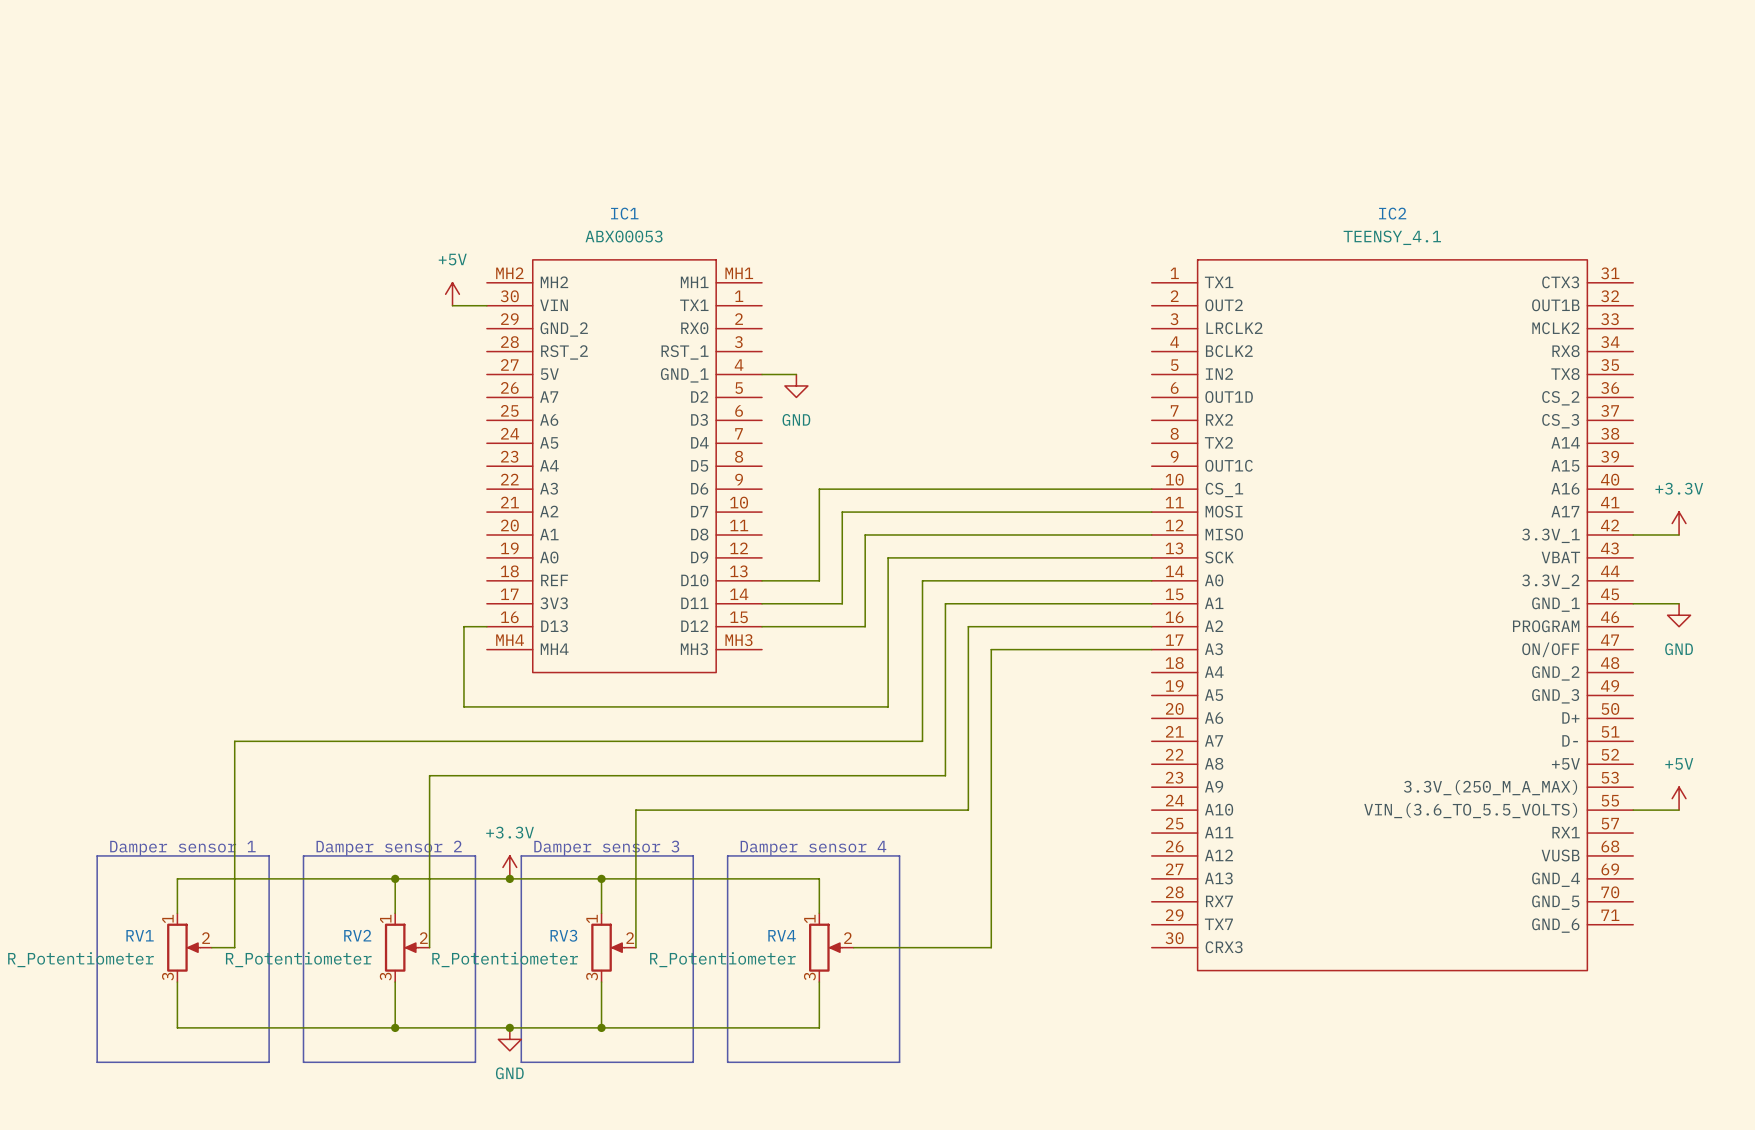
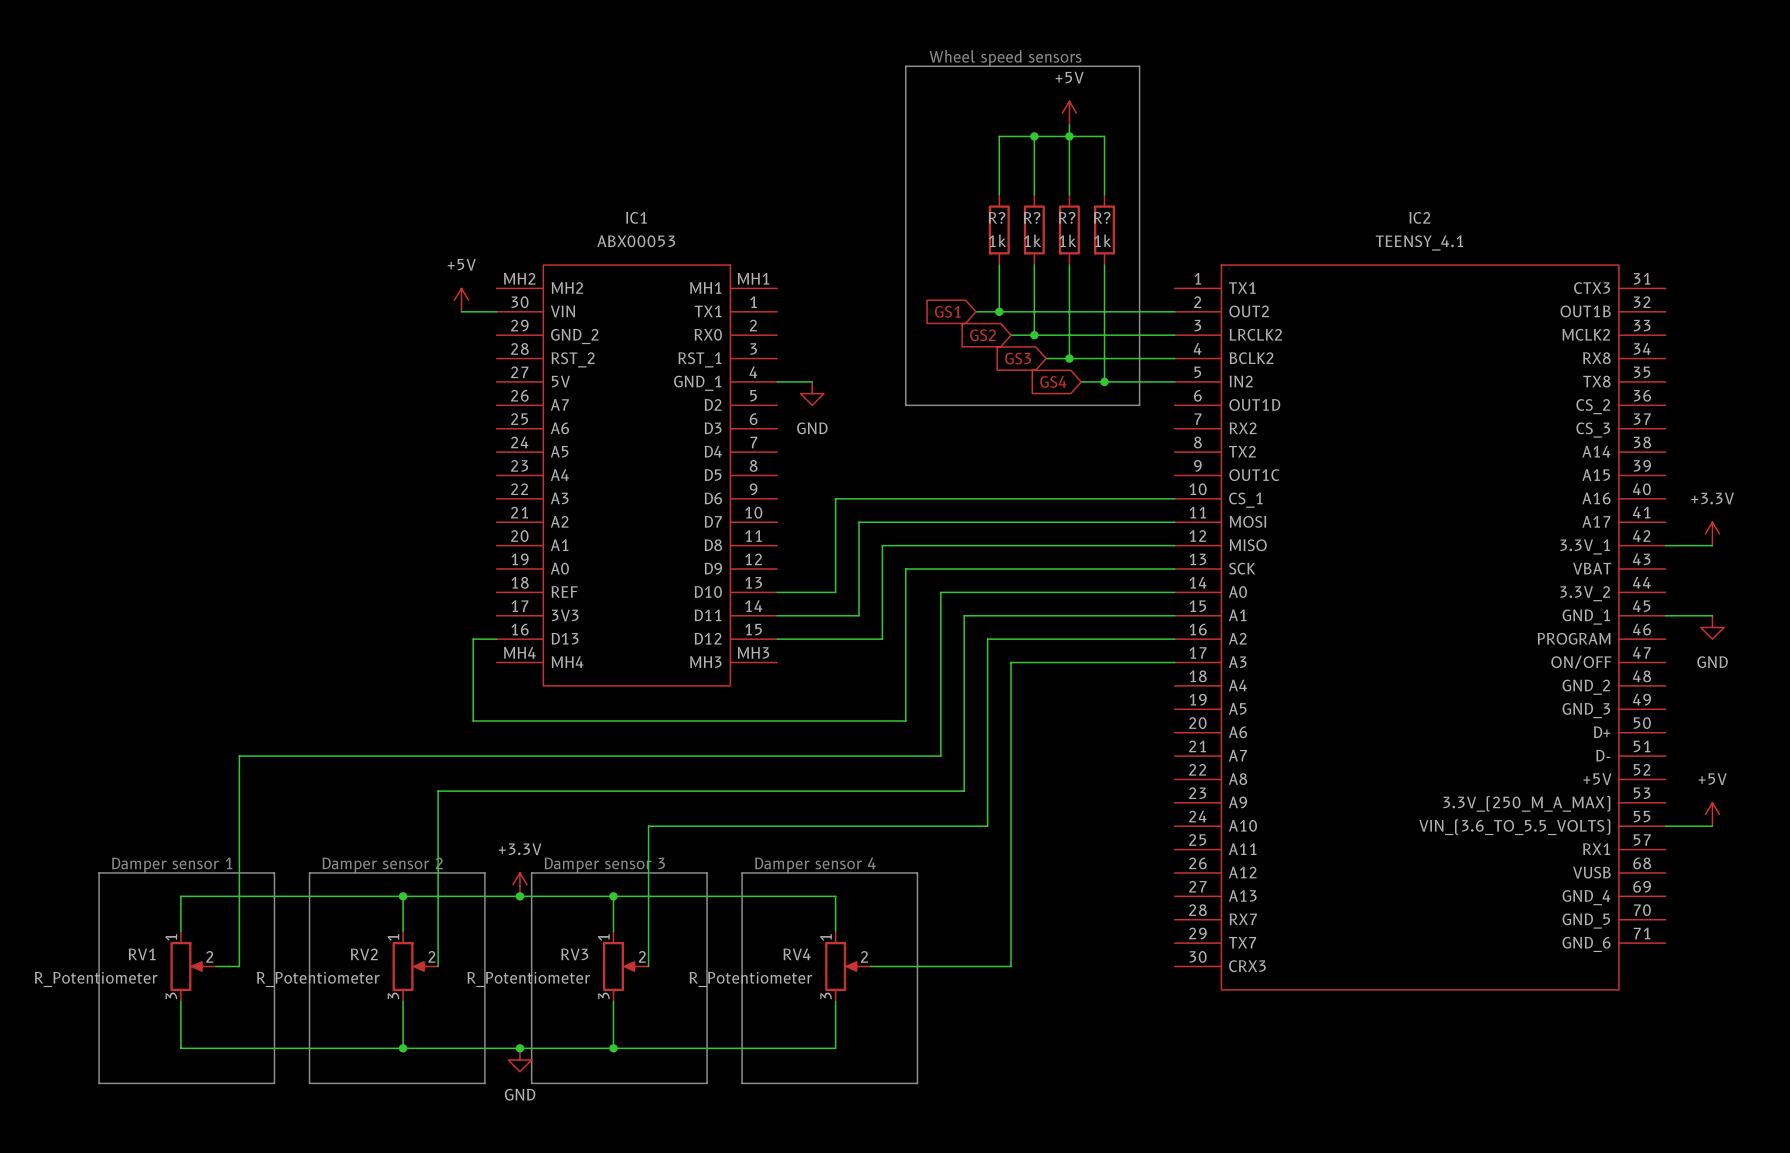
text: none -> Wheel speed sensors (1005, 58)
line: none -> (905, 66) (1139, 66) (1139, 405) (905, 405) (905, 66)
power symbol: none -> +5V (1069, 113)
wire: none -> (1069, 124) (1069, 194)
wire: none -> (1034, 136) (1034, 194)
junction: none -> (1034, 136)
junction: none -> (1069, 136)
wire: none -> (999, 194) (999, 136) (1104, 136) (1104, 194)
R?: none -> 1k (999, 229)
R?: none -> 1k (1034, 229)
R?: none -> 1k (1069, 229)
R?: none -> 1k (1104, 229)
wire: none -> (999, 265) (999, 311)
wire: none -> (1034, 265) (1034, 335)
wire: none -> (1069, 265) (1069, 358)
wire: none -> (1104, 265) (1104, 381)
global label: none -> GS1 (947, 311)
wire: none -> (975, 311) (1174, 311)
junction: none -> (999, 311)
global label: none -> GS2 (983, 335)
wire: none -> (1010, 335) (1174, 335)
junction: none -> (1034, 335)
global label: none -> GS3 (1018, 358)
wire: none -> (1046, 358) (1174, 358)
junction: none -> (1069, 358)
global label: none -> GS4 (1053, 382)
wire: none -> (1081, 381) (1174, 381)
junction: none -> (1104, 381)

